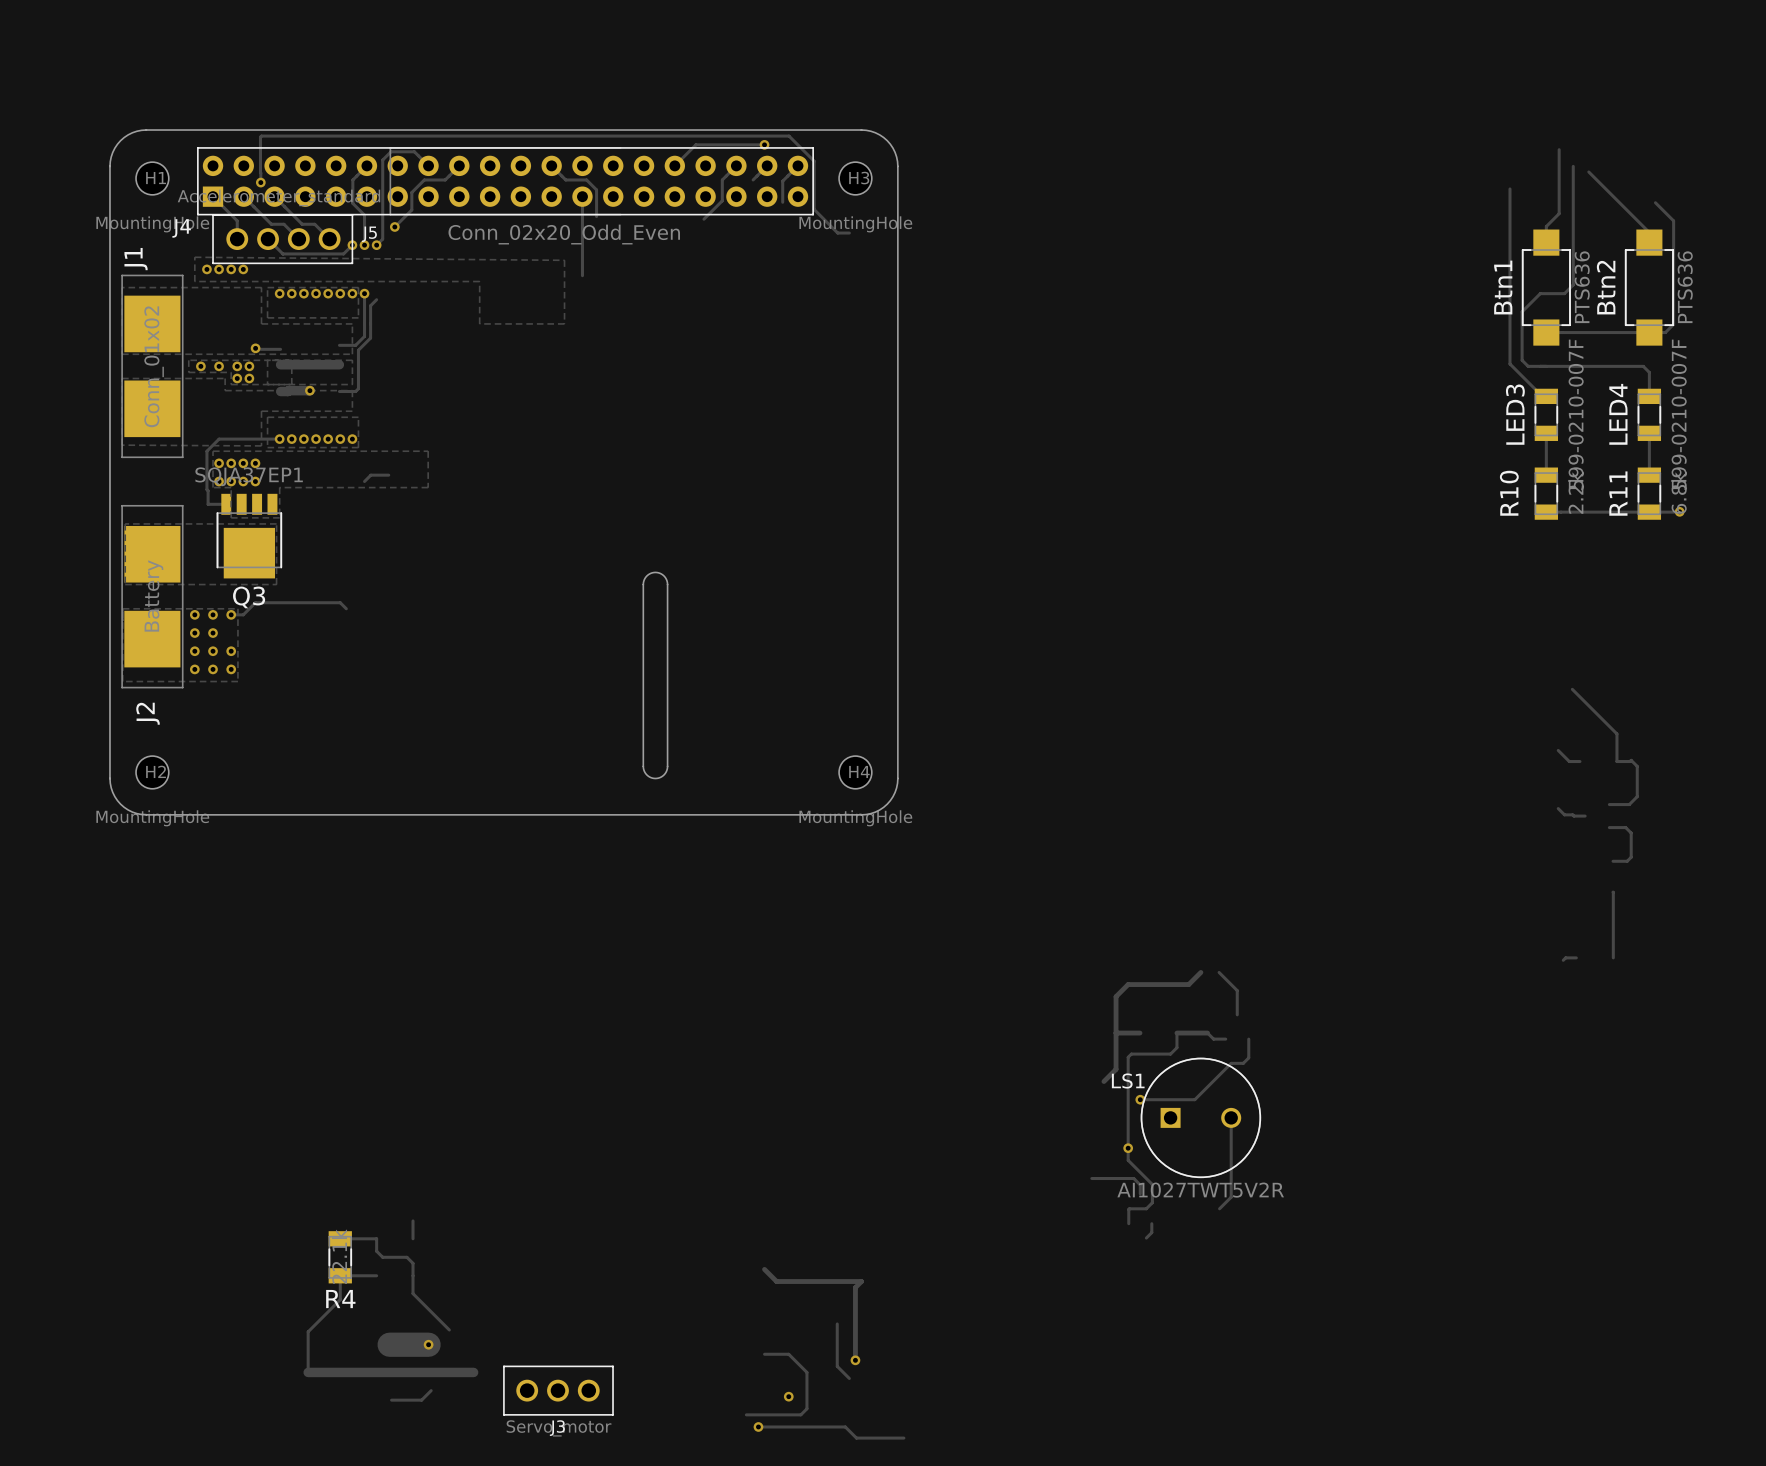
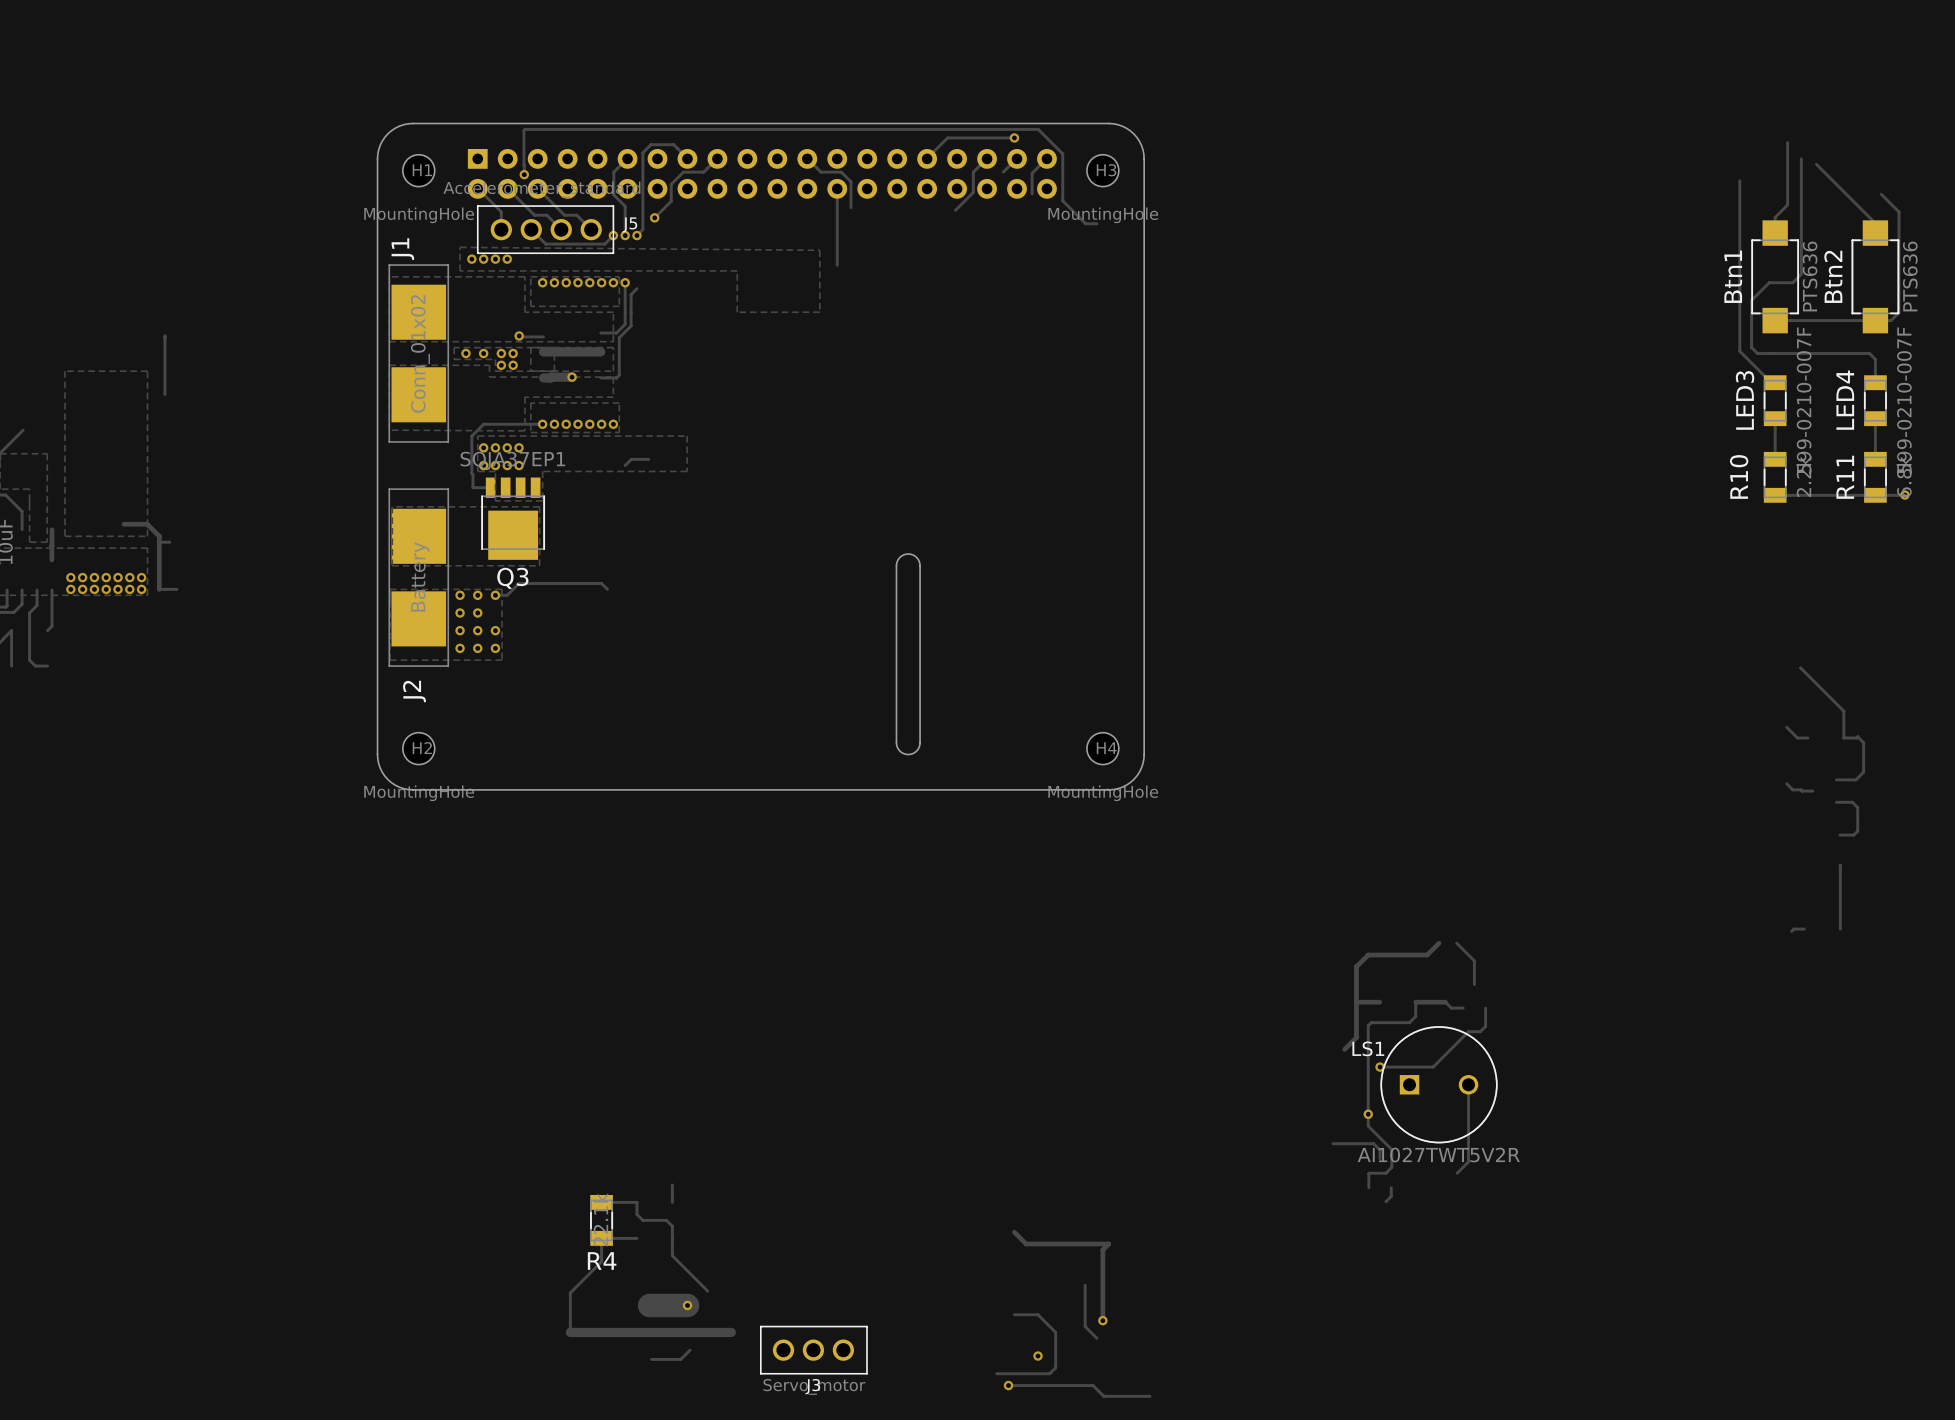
J4 side: top (505, 181) -> bottom (762, 173)

